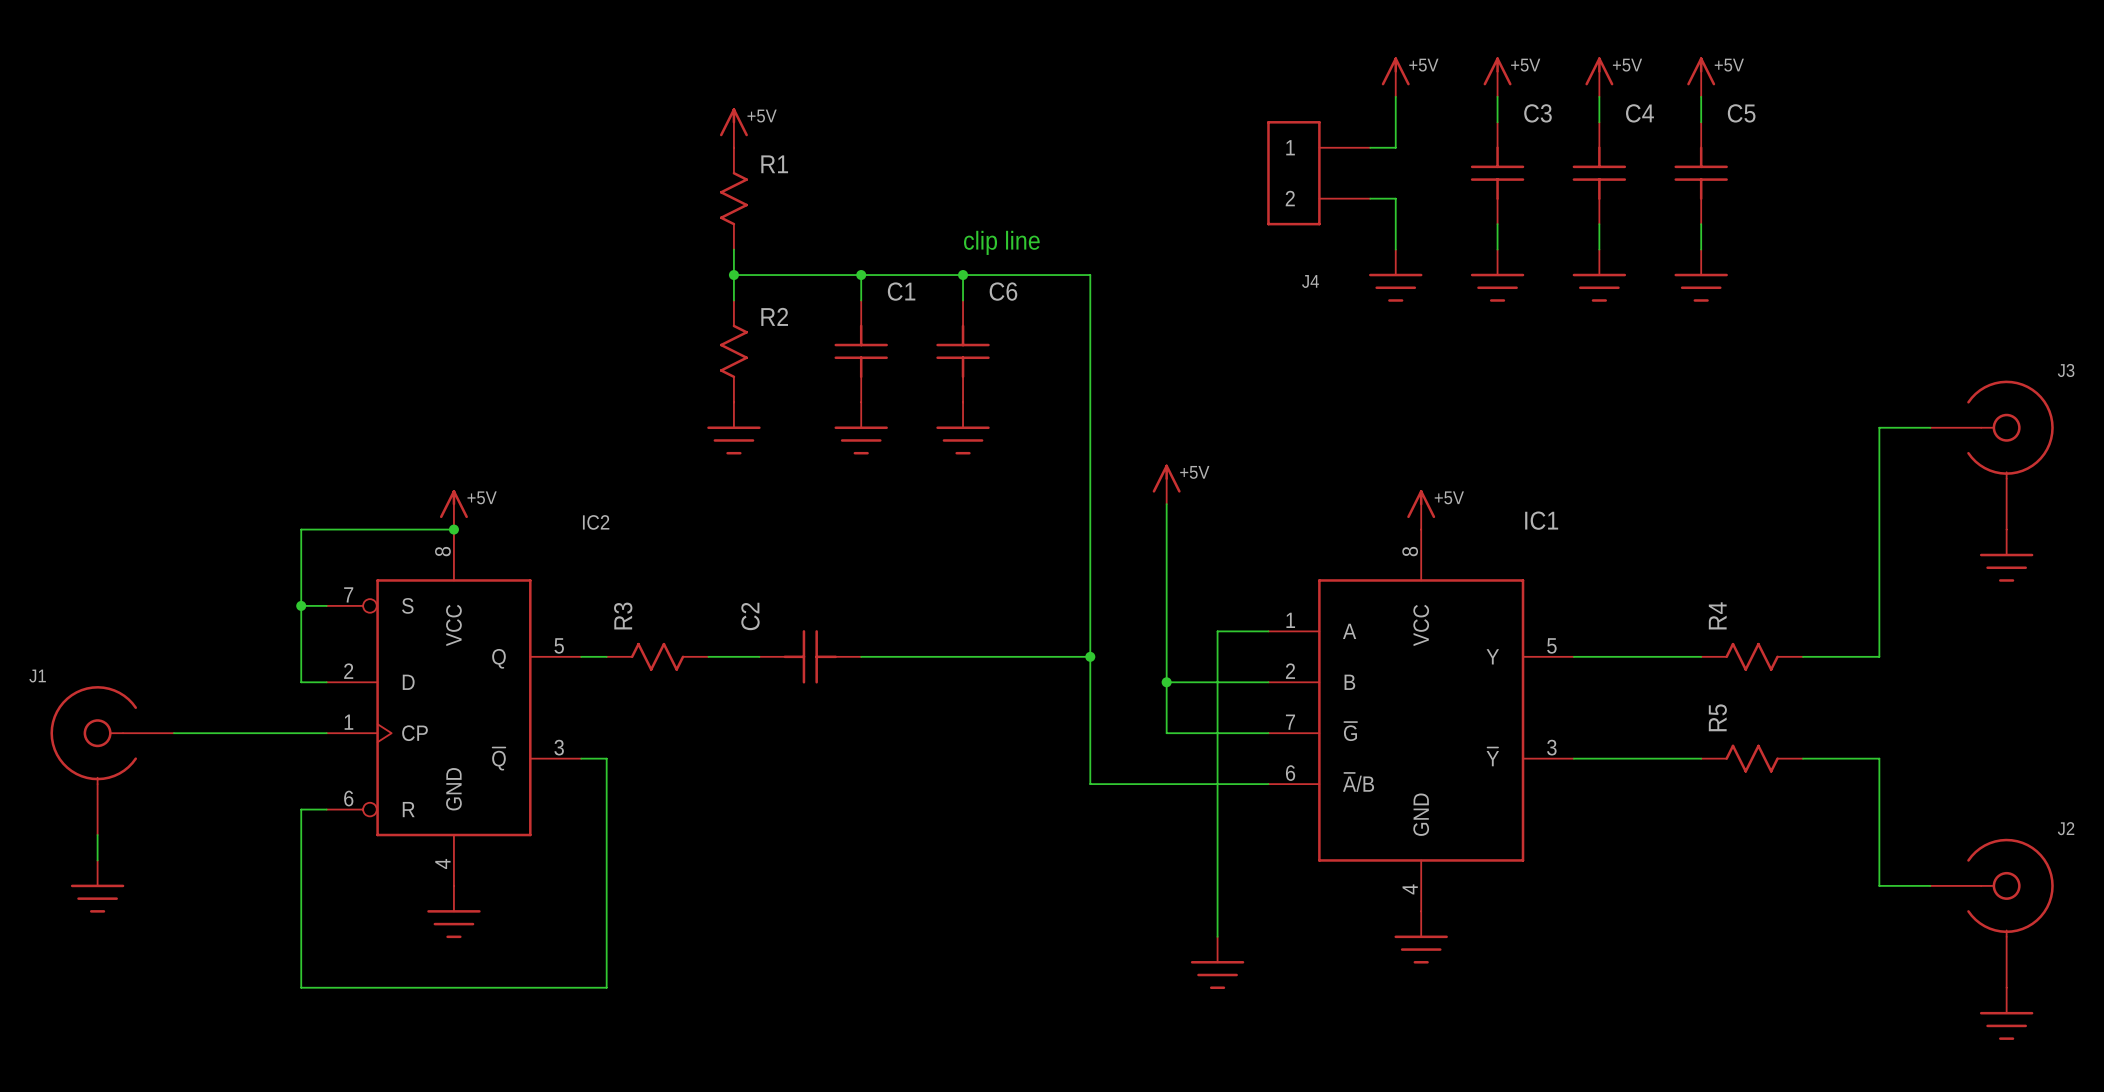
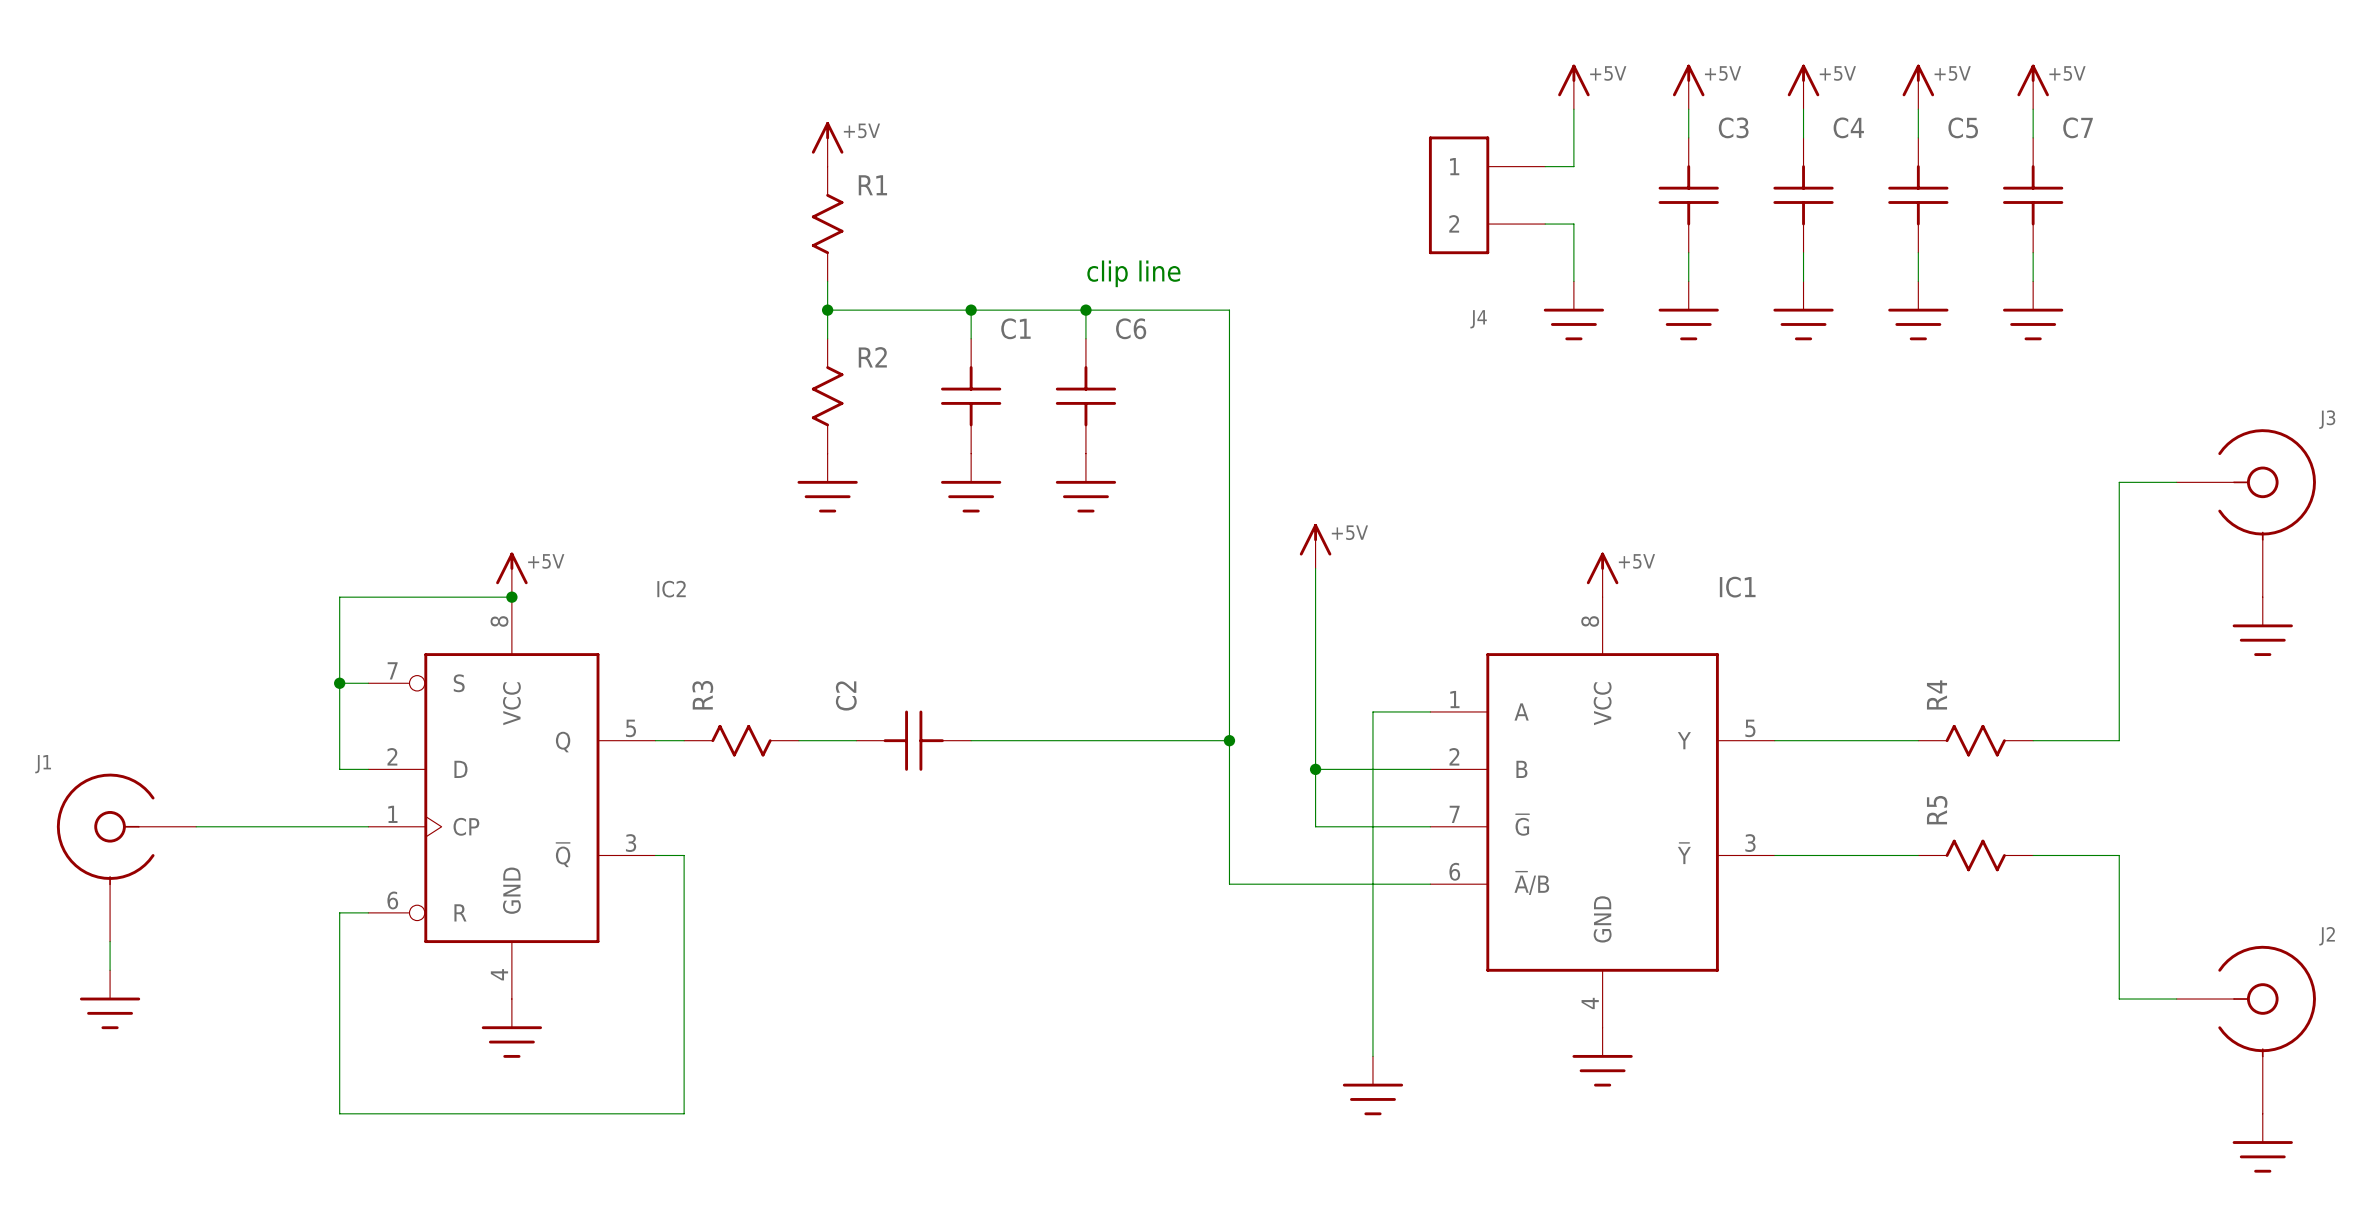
power symbol: none -> +5V (2033, 86)
wire: none -> (2033, 109) (2033, 137)
C7: none -> (2033, 195)
wire: none -> (2033, 252) (2033, 281)
power symbol: none -> (2033, 310)

